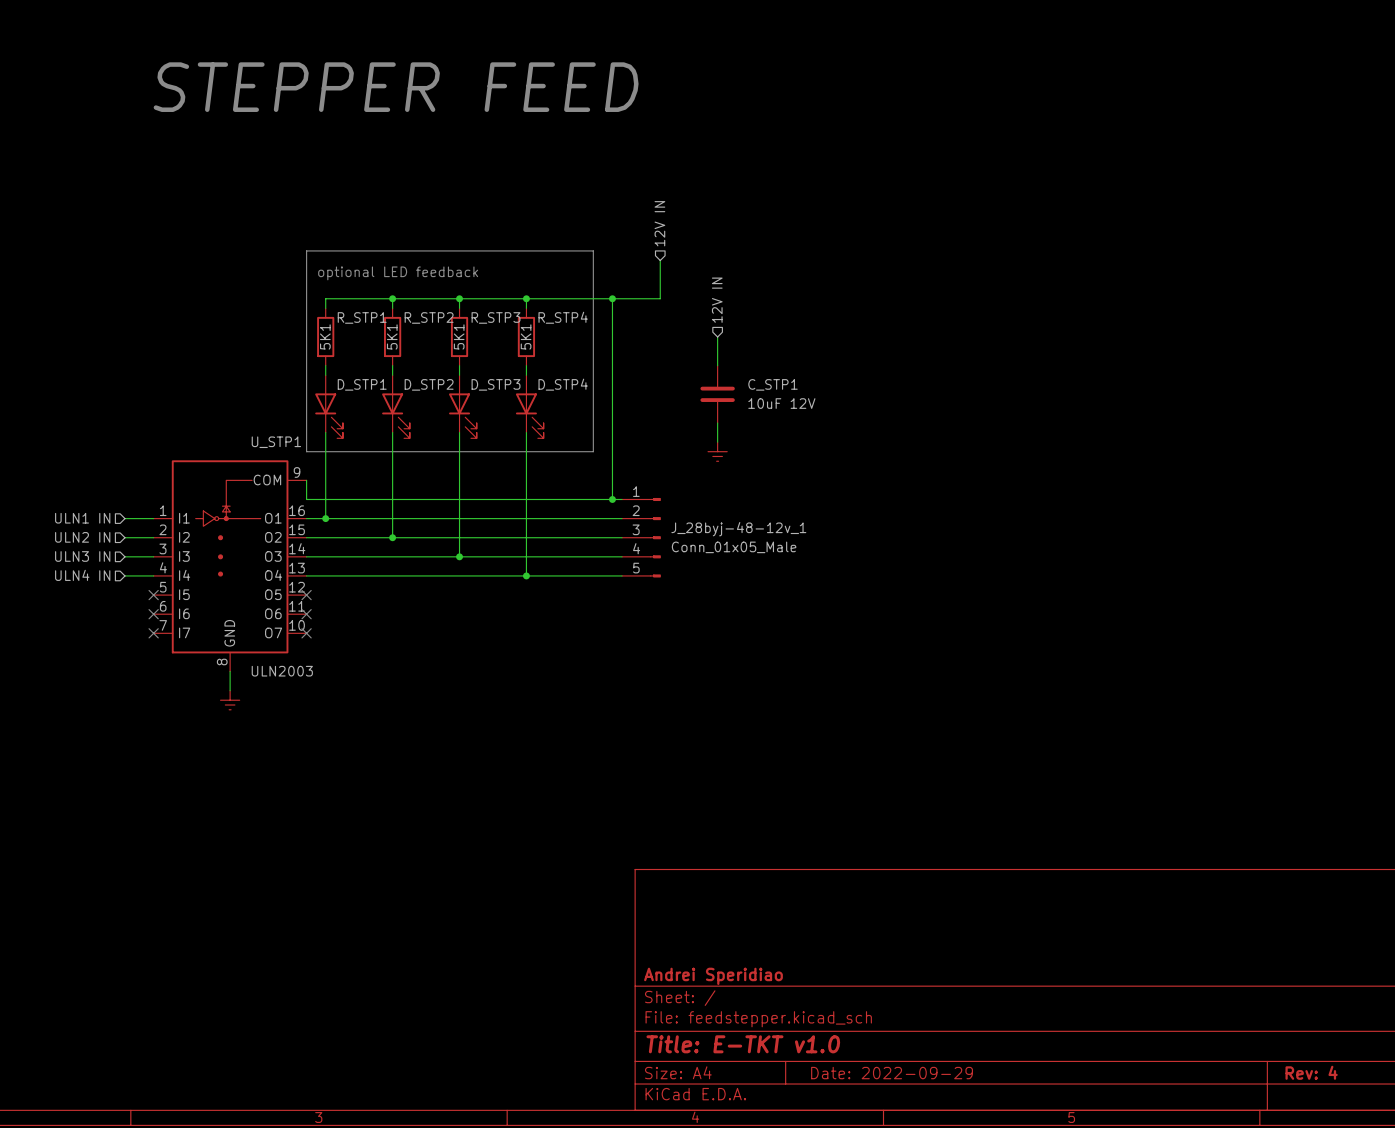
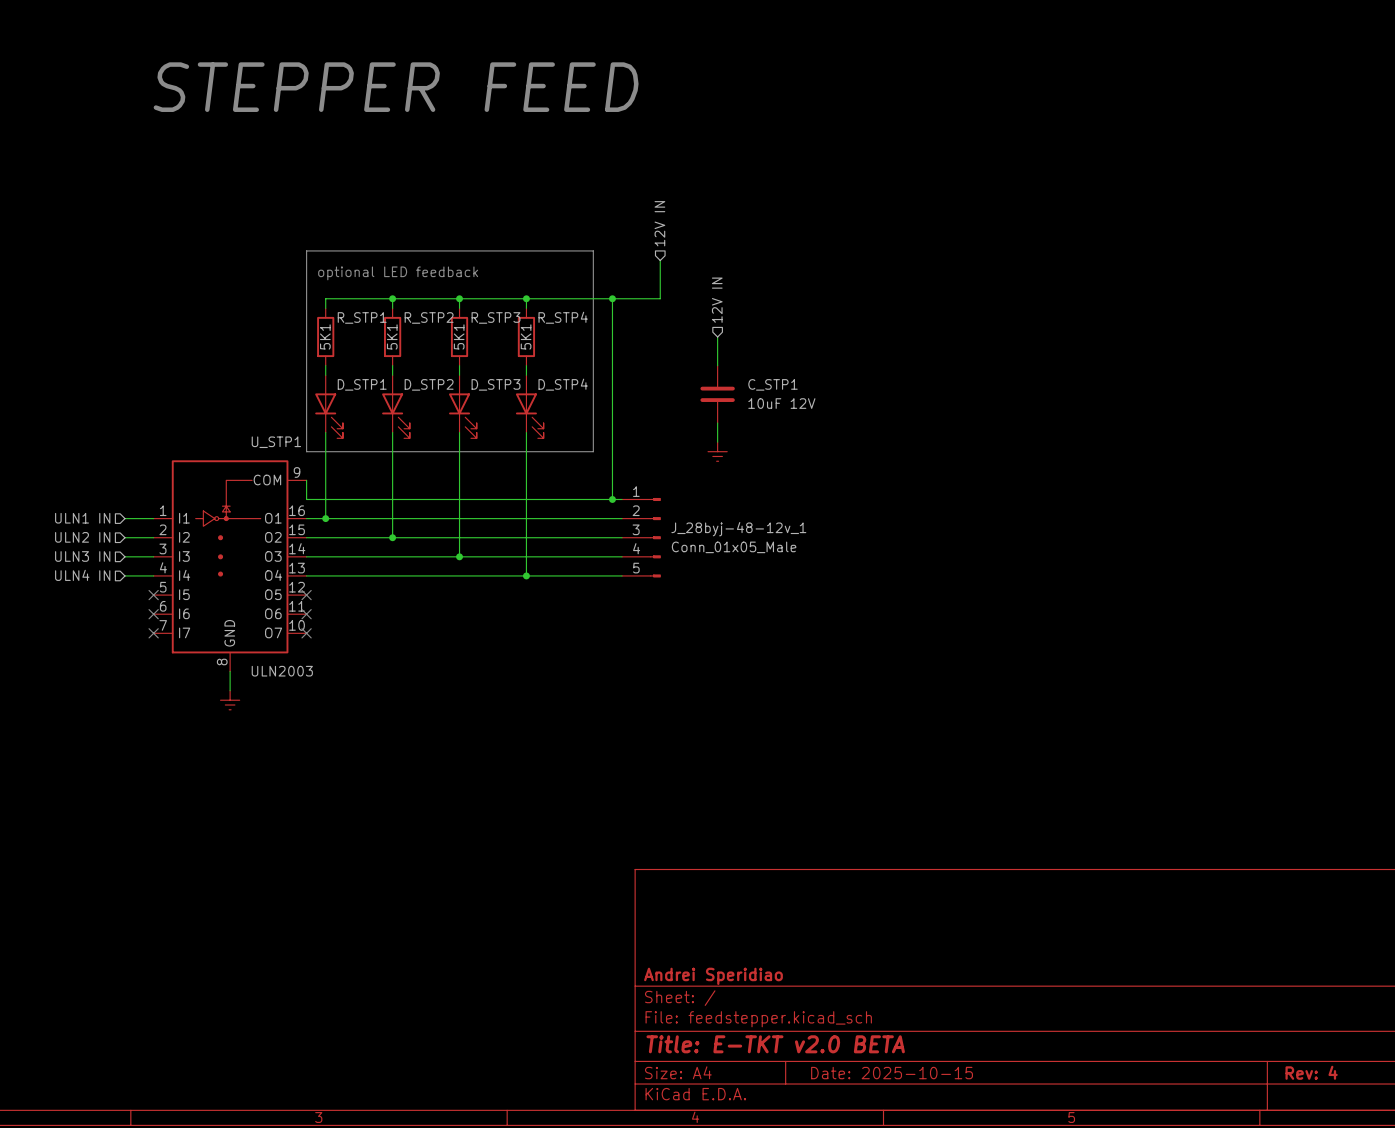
title block: Title: E-TKT v1.0 (743, 1044) -> Title: E-TKT v2.0 BETA (775, 1044)
title block: Date: 2022-09-29 (892, 1073) -> Date: 2025-10-15 (892, 1073)

